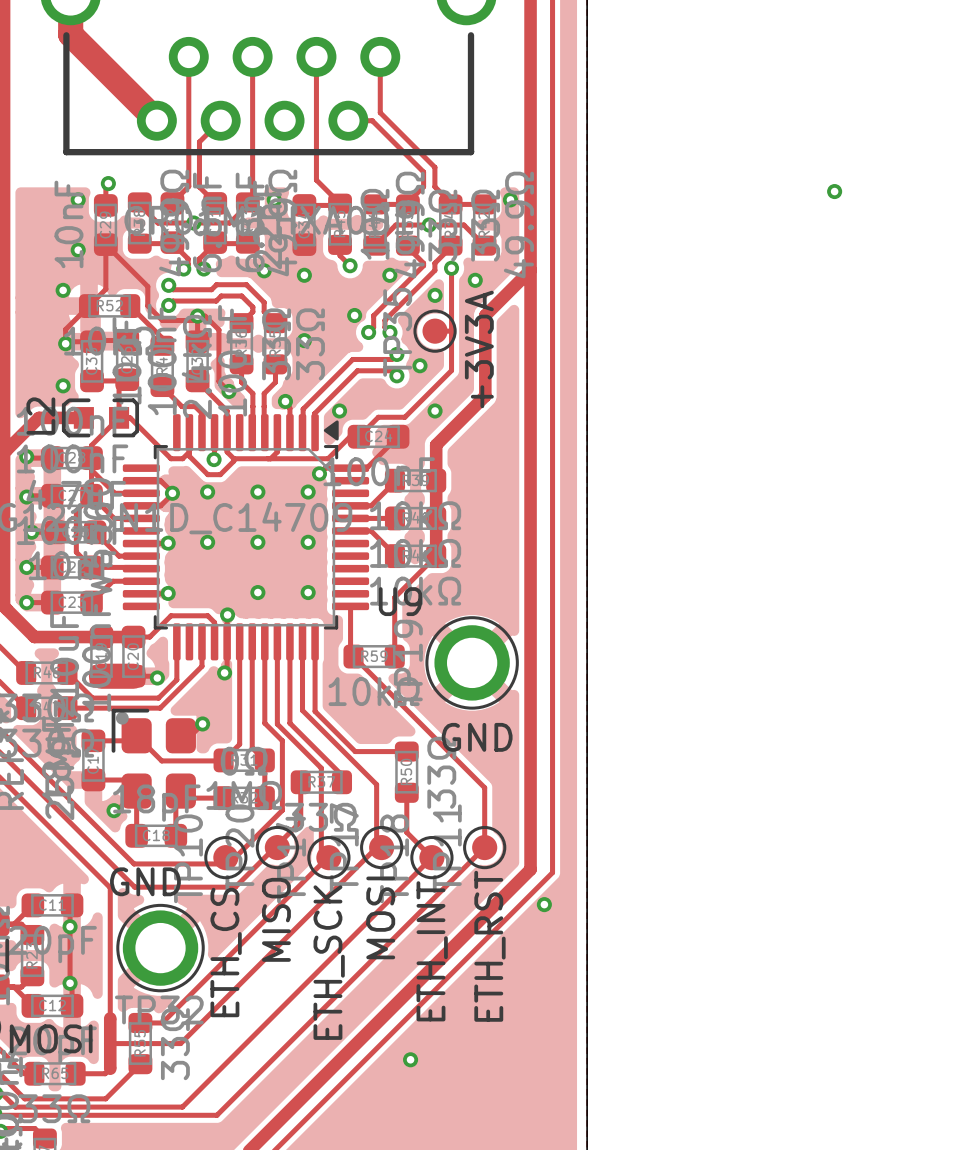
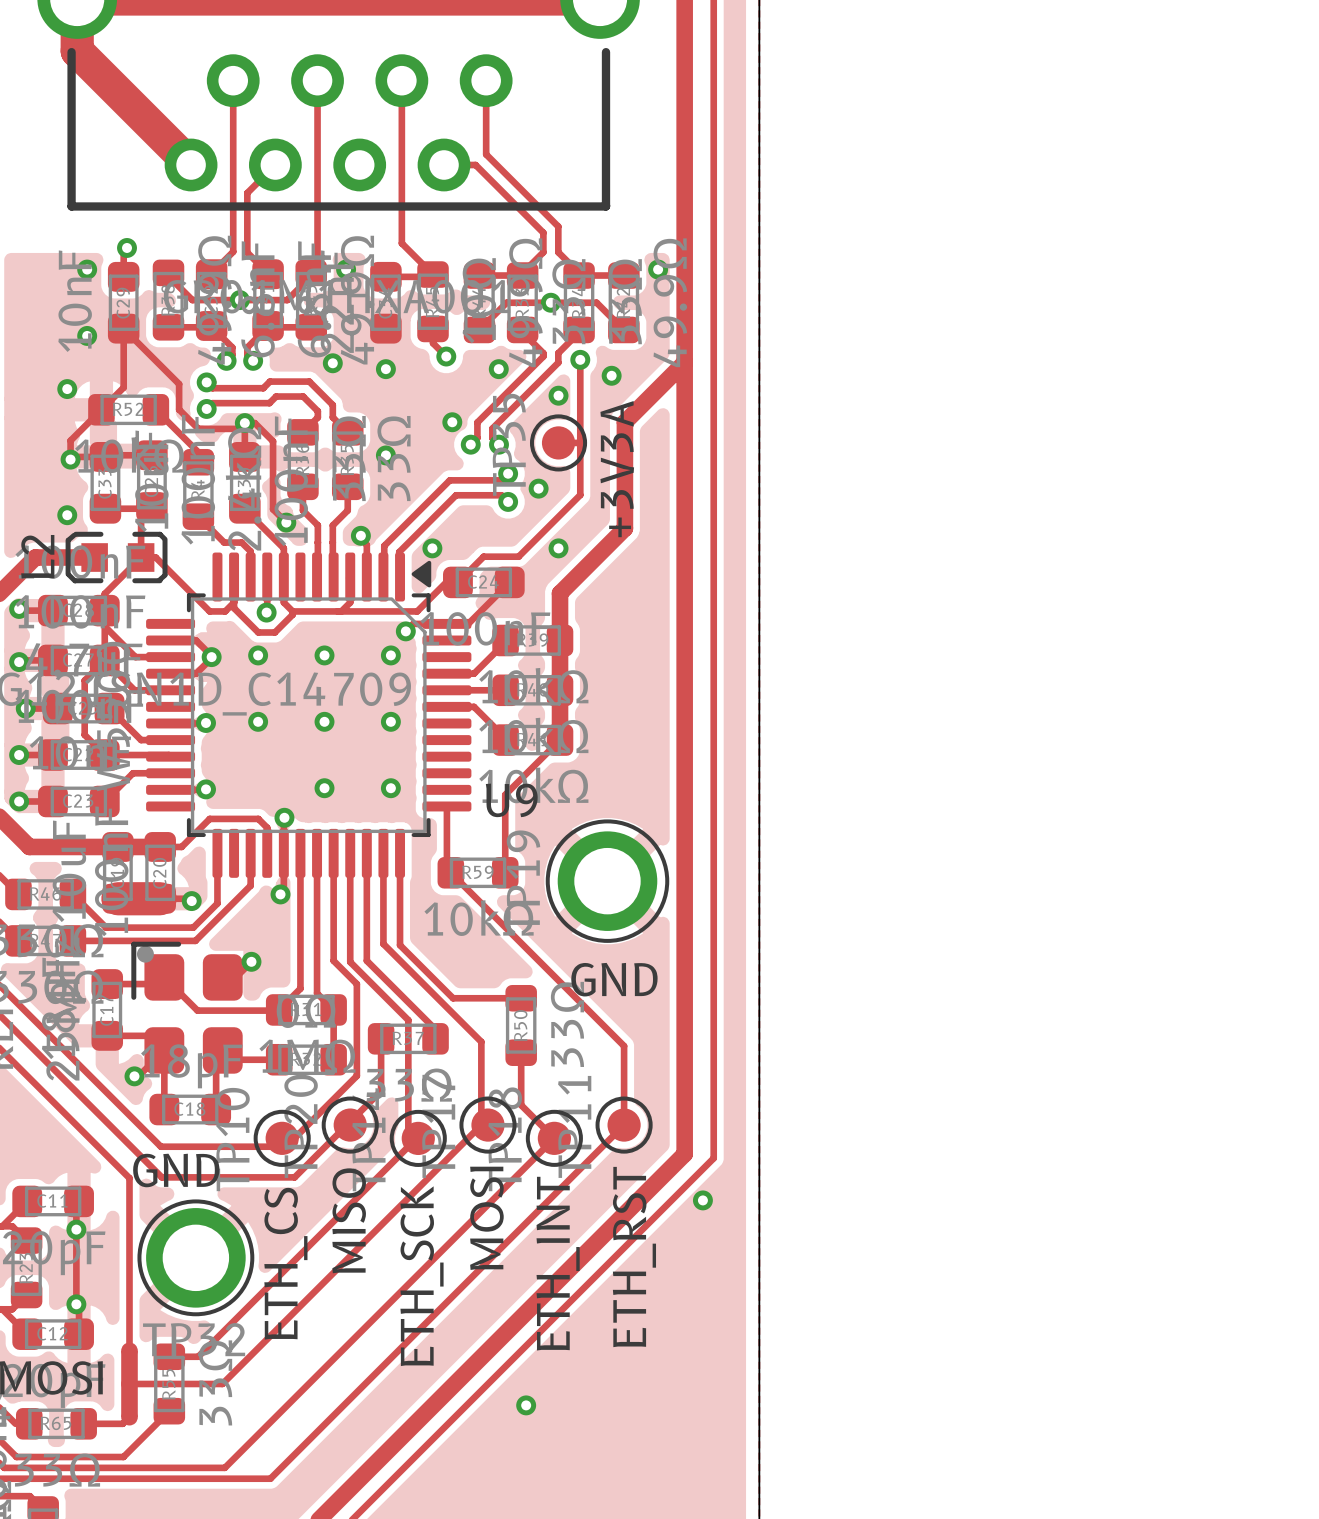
via: (834, 191) -> none

